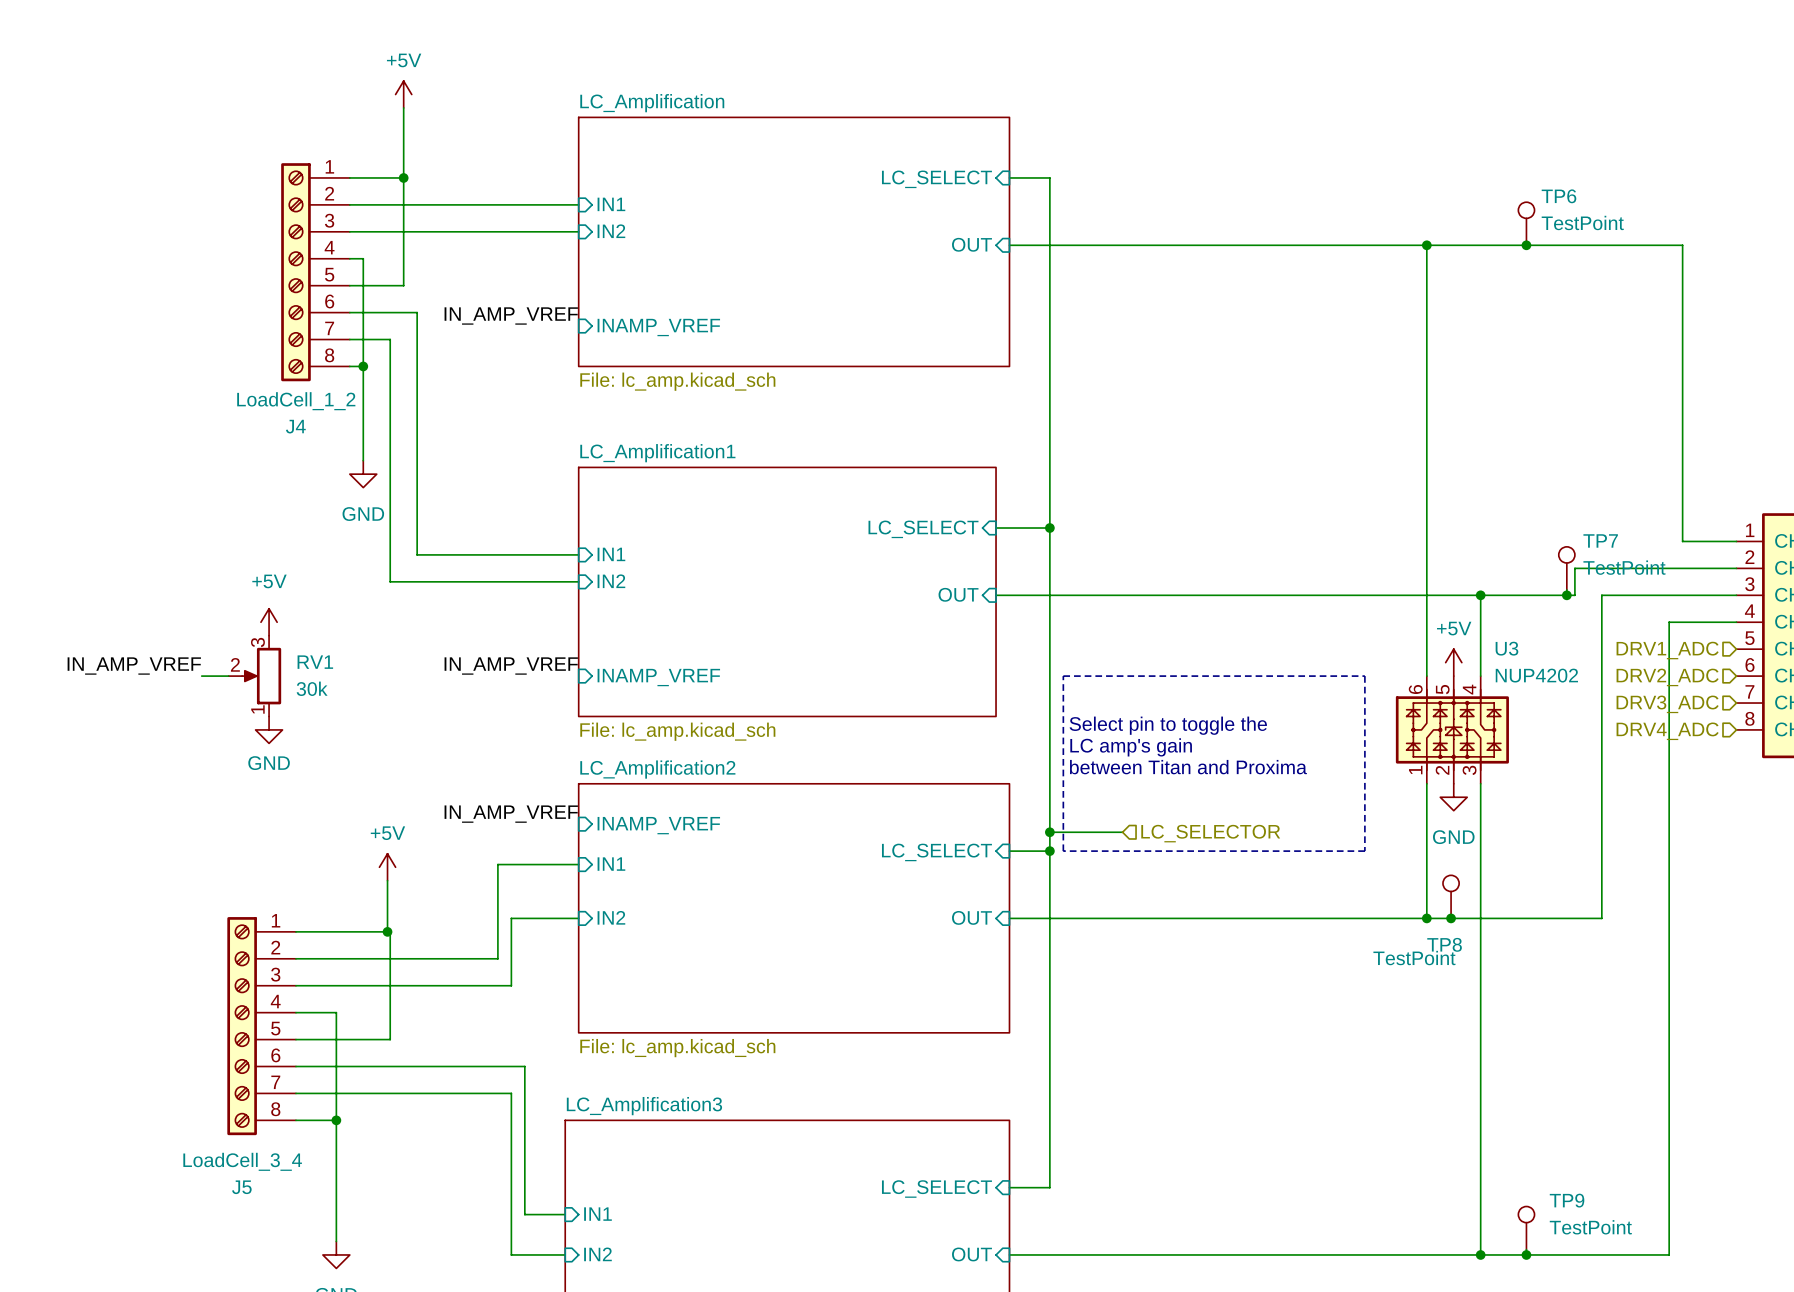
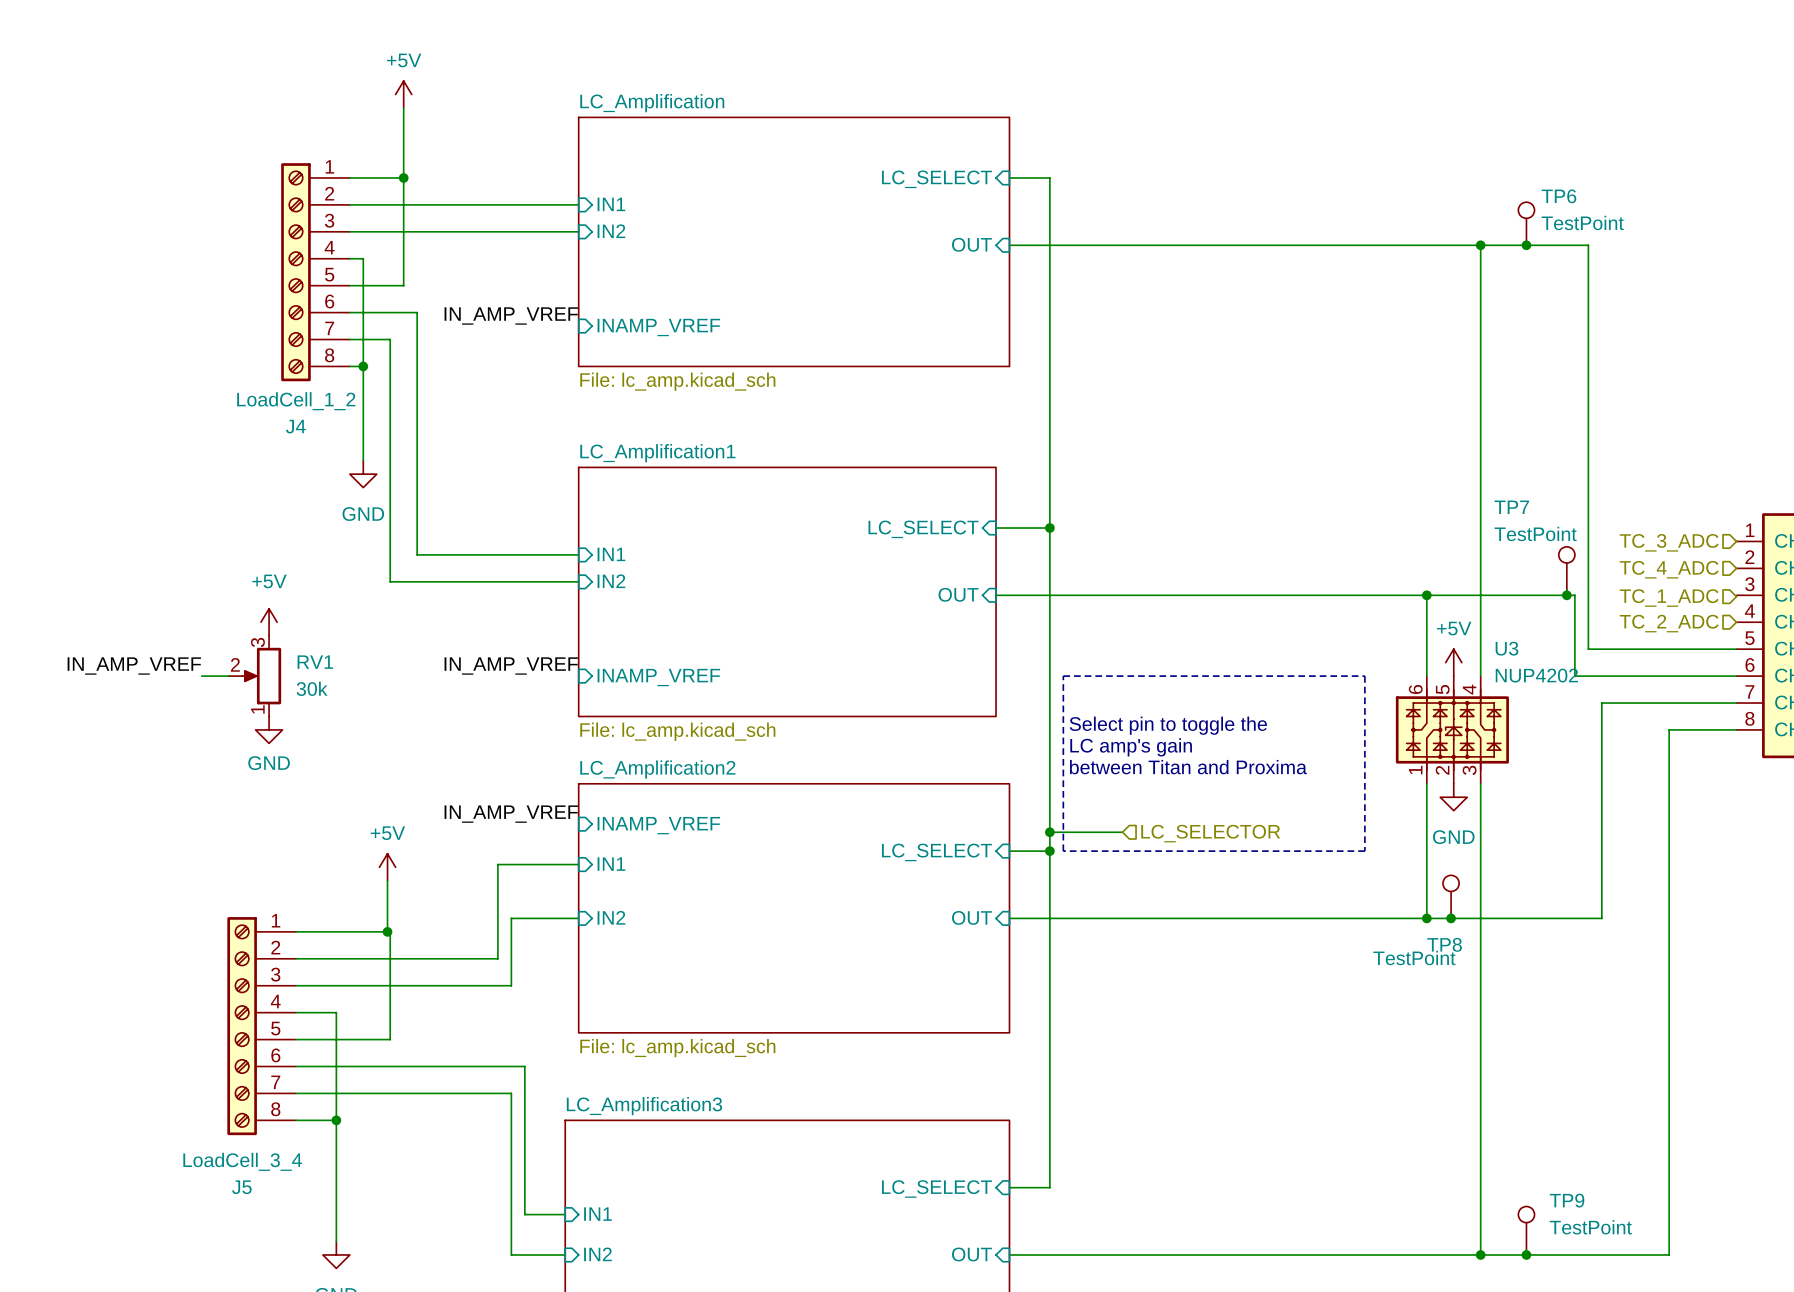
wire: (1426, 245) (1426, 595) -> (1480, 245) (1480, 595)
junction position: (1426, 245) -> (1480, 245)
wire: (1588, 245) (1682, 245) (1682, 541) (1736, 541) -> (1588, 245) (1588, 649) (1736, 649)
TP7 name position: TP7 (1600, 540) -> TP7 (1511, 507)
hierarchical label: none -> TC_3_ADC (1669, 542)
TP7 value position: TestPoint (1624, 567) -> TestPoint (1535, 533)
wire: (1736, 568) (1574, 568) (1574, 595) -> (1736, 676) (1574, 676) (1574, 595)
hierarchical label: none -> TC_4_ADC (1669, 569)
junction position: (1480, 595) -> (1426, 595)
wire: (1736, 595) (1601, 595) (1601, 703) -> (1736, 703) (1601, 703)
hierarchical label: none -> TC_1_ADC (1669, 598)
wire: (1736, 622) (1669, 622) (1669, 729) -> (1736, 729) (1669, 729)
hierarchical label: none -> TC_2_ADC (1669, 623)
hierarchical label: DRV1_ADC (1667, 650) -> none
hierarchical label: DRV2_ADC (1667, 677) -> none
hierarchical label: DRV3_ADC (1667, 704) -> none
hierarchical label: DRV4_ADC (1667, 731) -> none

